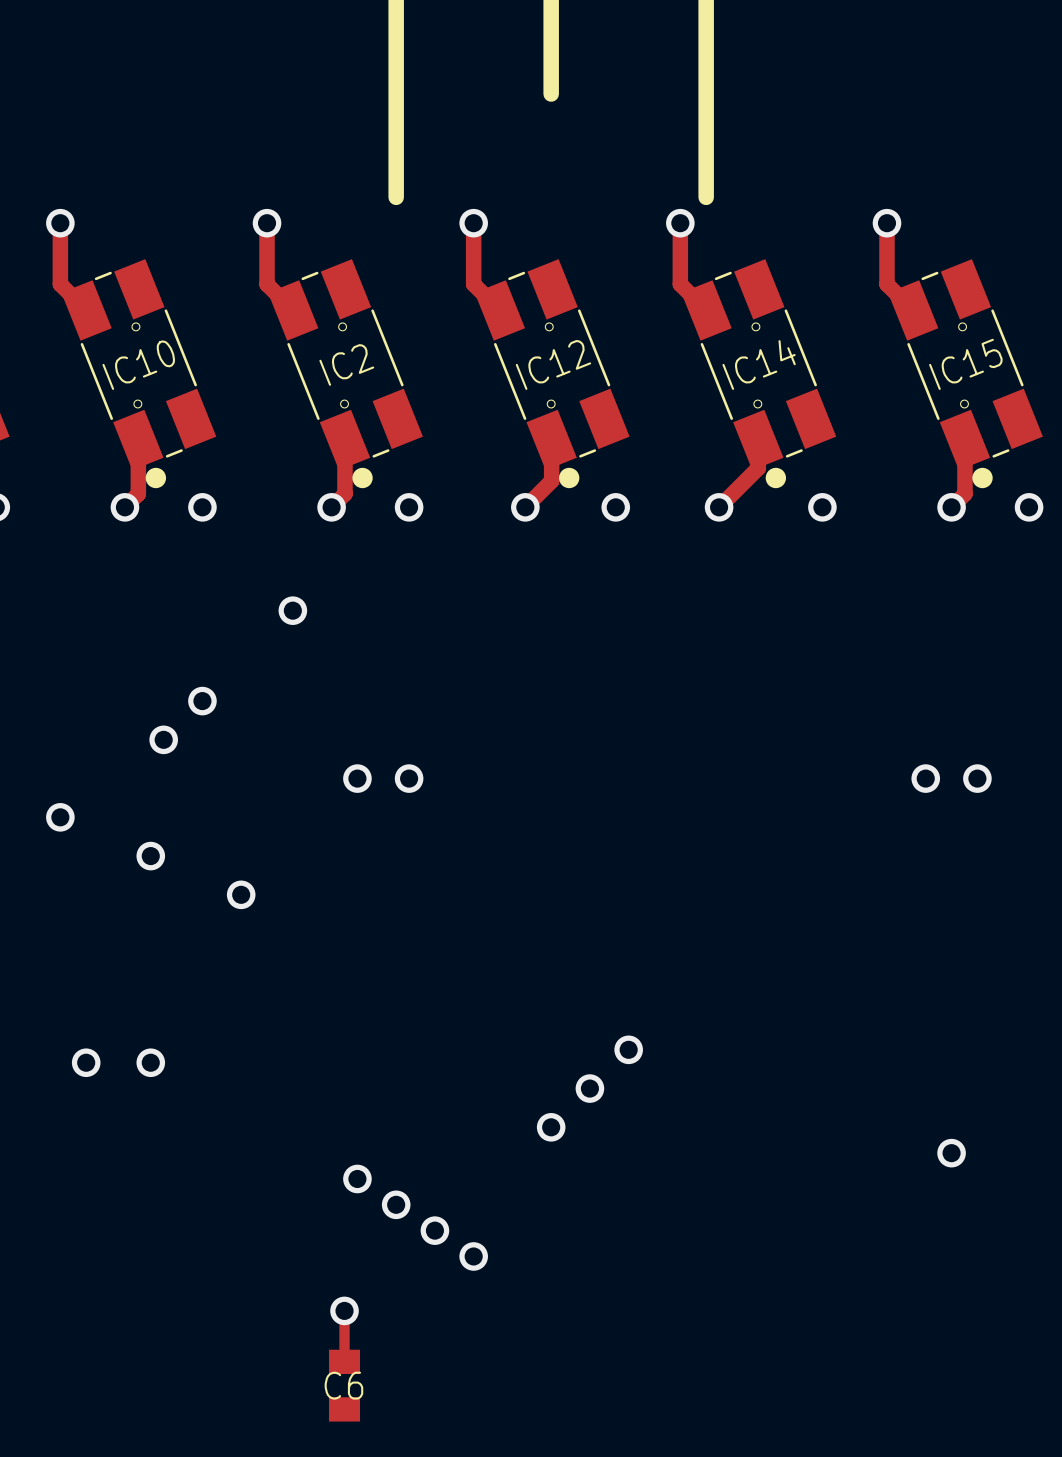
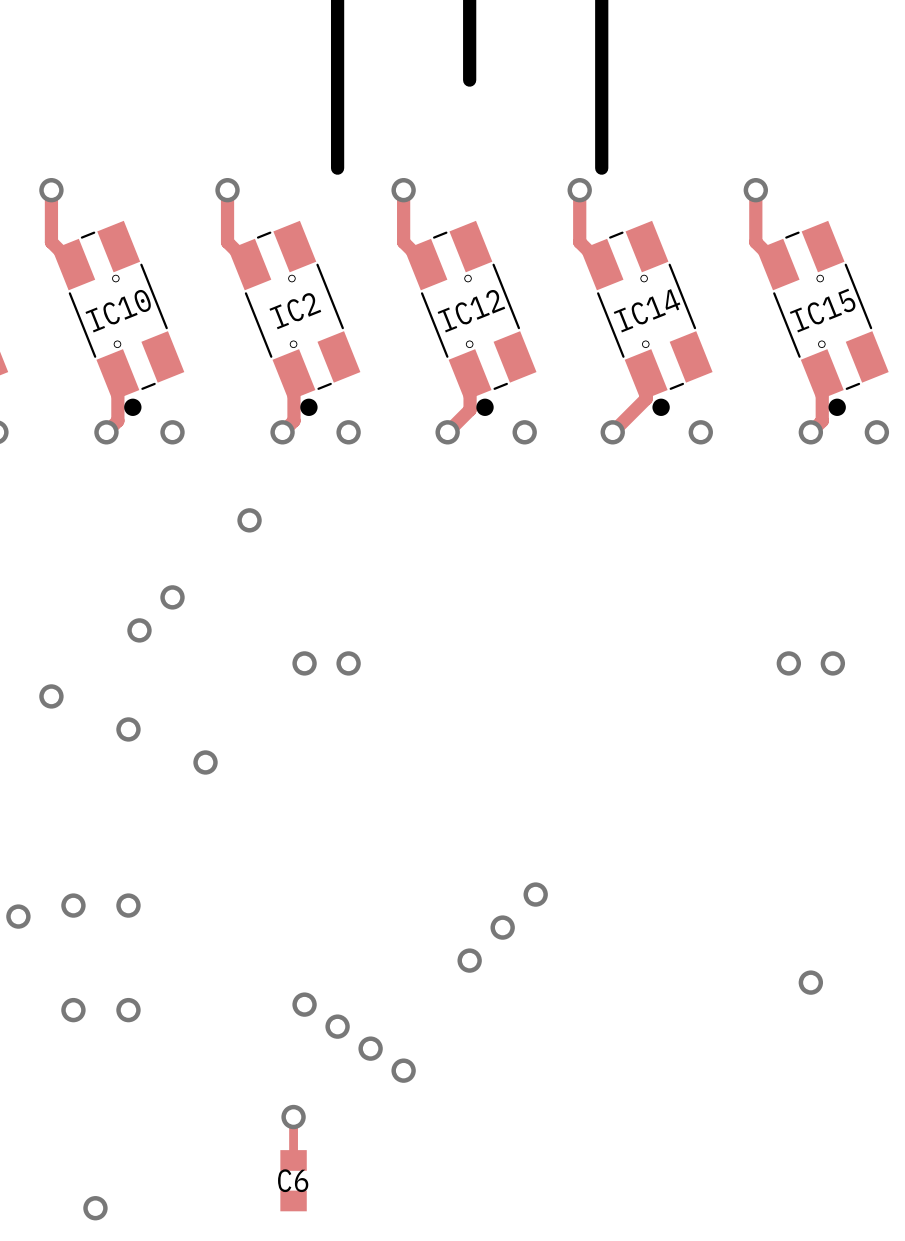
via: none -> (18, 916)
via: none -> (73, 1010)
via: none -> (128, 1010)
via: none -> (95, 1208)

